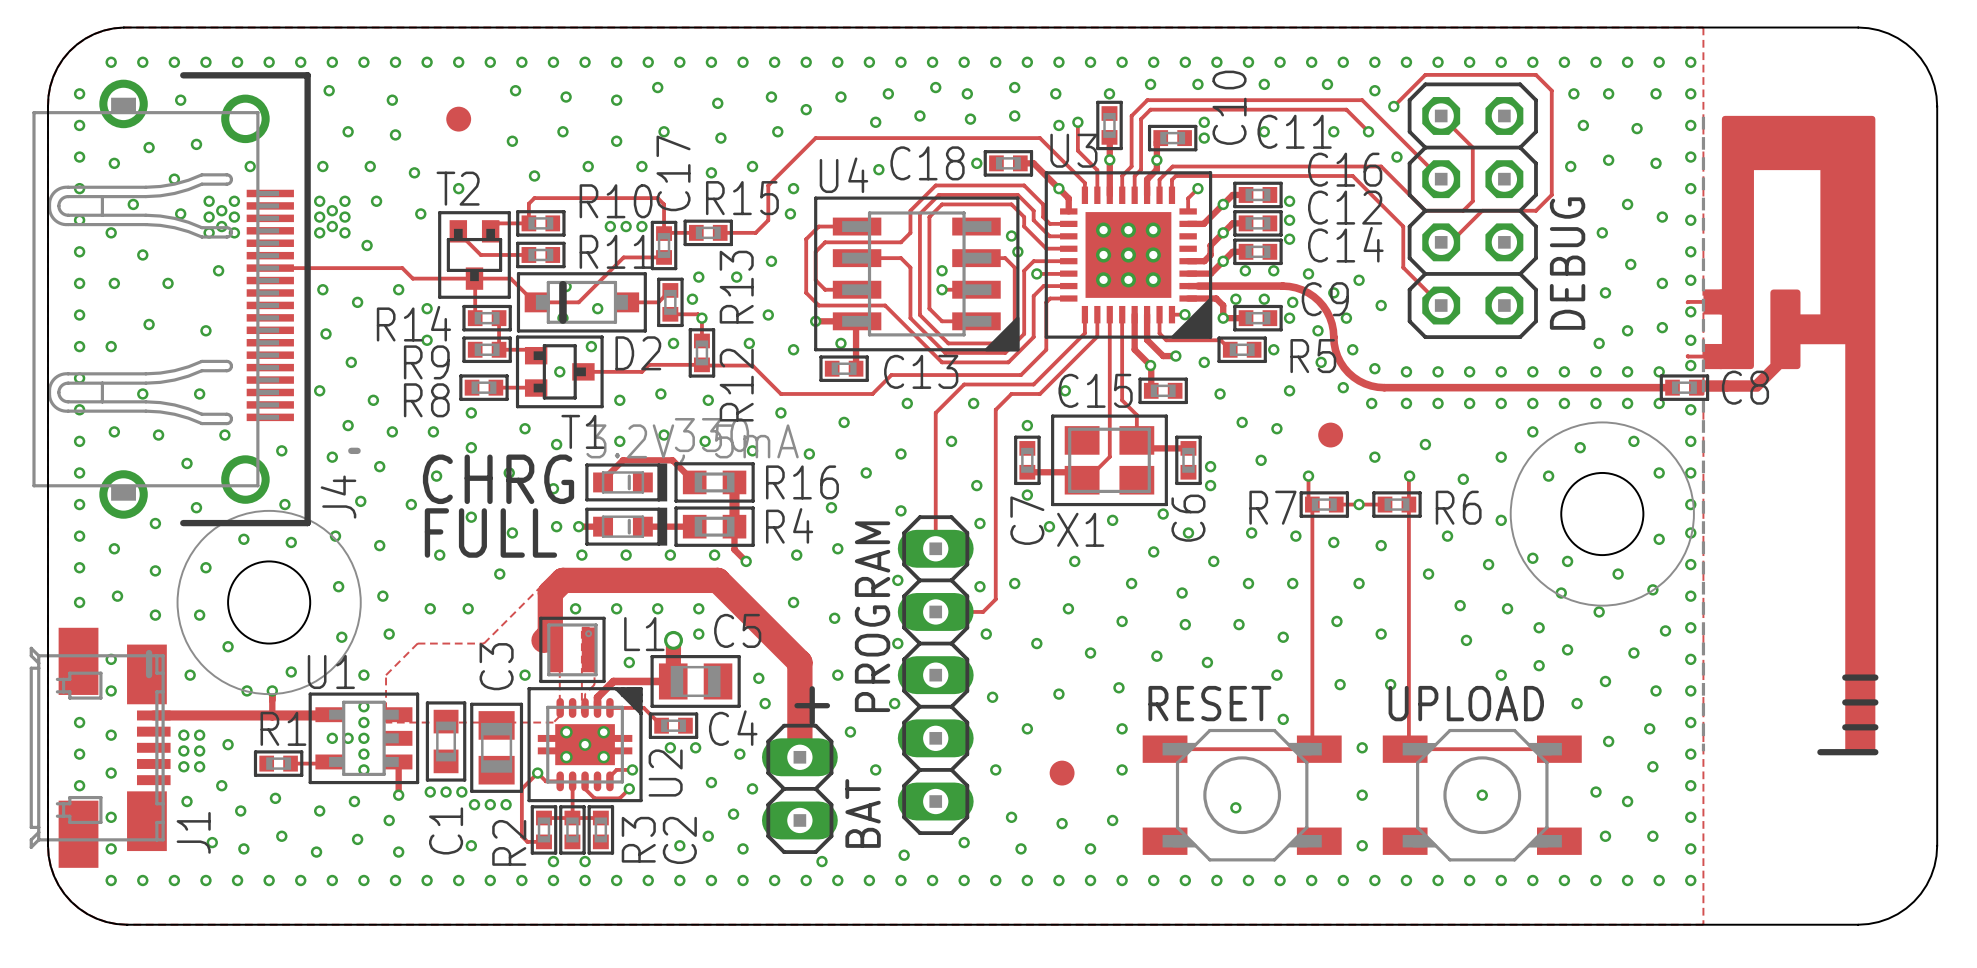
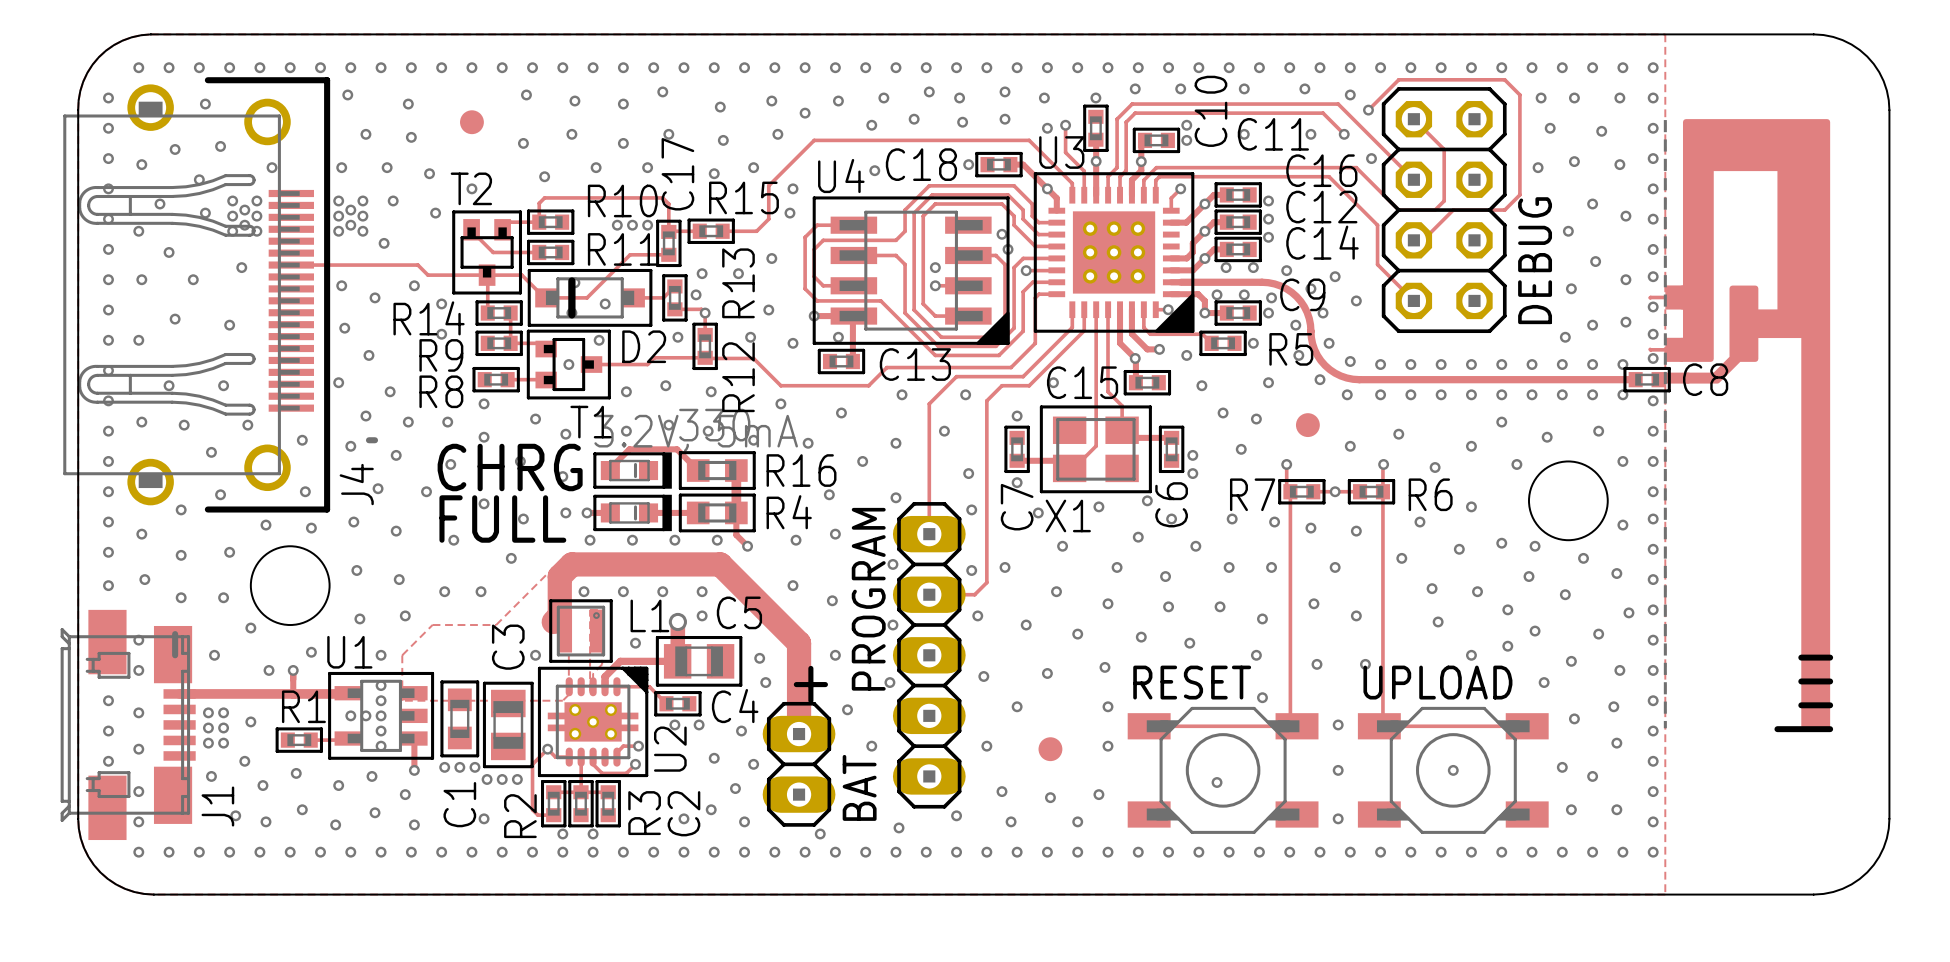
drawing: [1510, 421, 1695, 607] -> none
drawing: [176, 510, 362, 695] -> none

